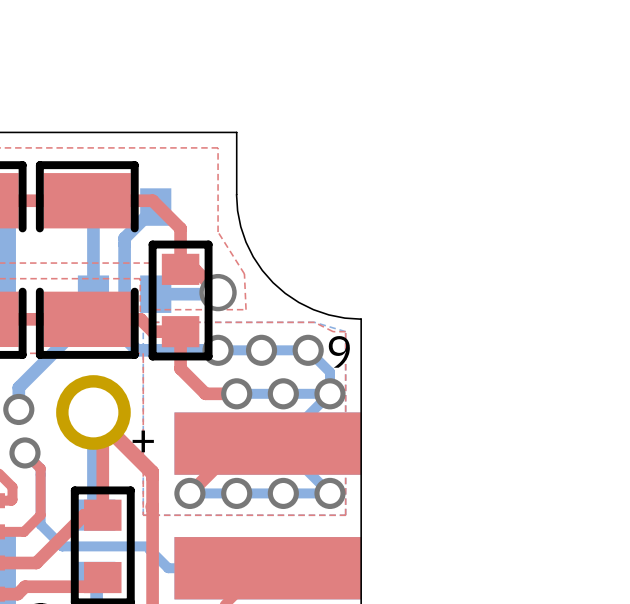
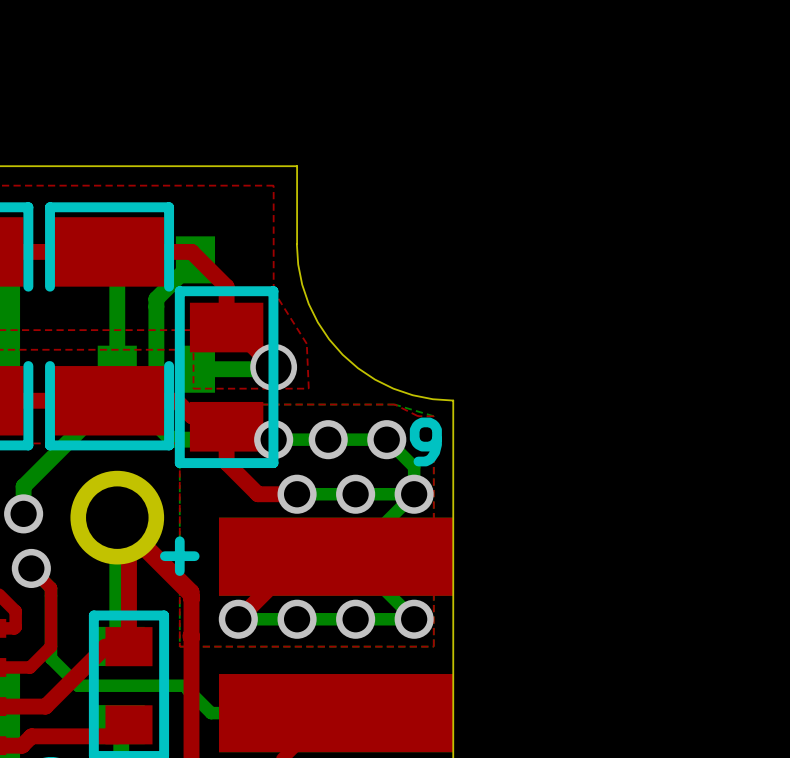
part footprint: [148, 240, 213, 361] -> [174, 286, 279, 469]

